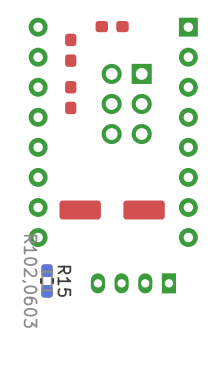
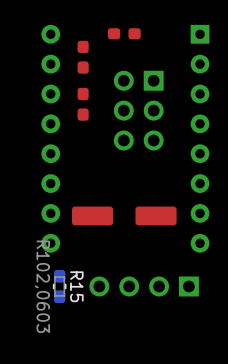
part footprint: [90, 273, 177, 294] -> [89, 276, 199, 297]

